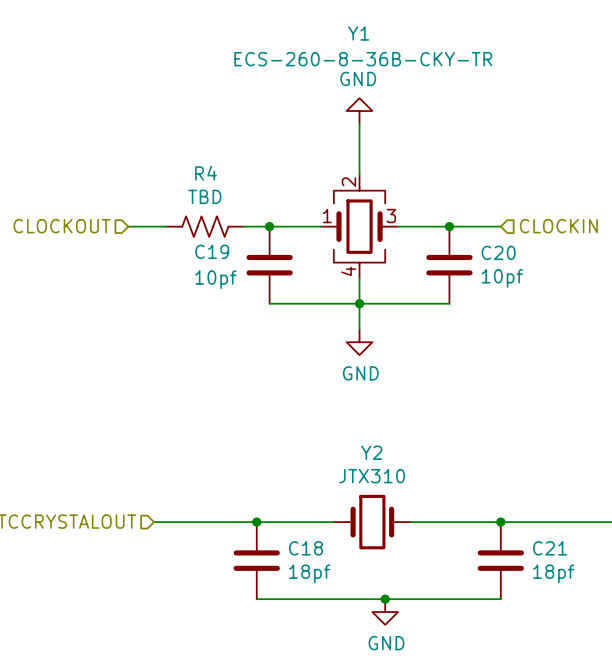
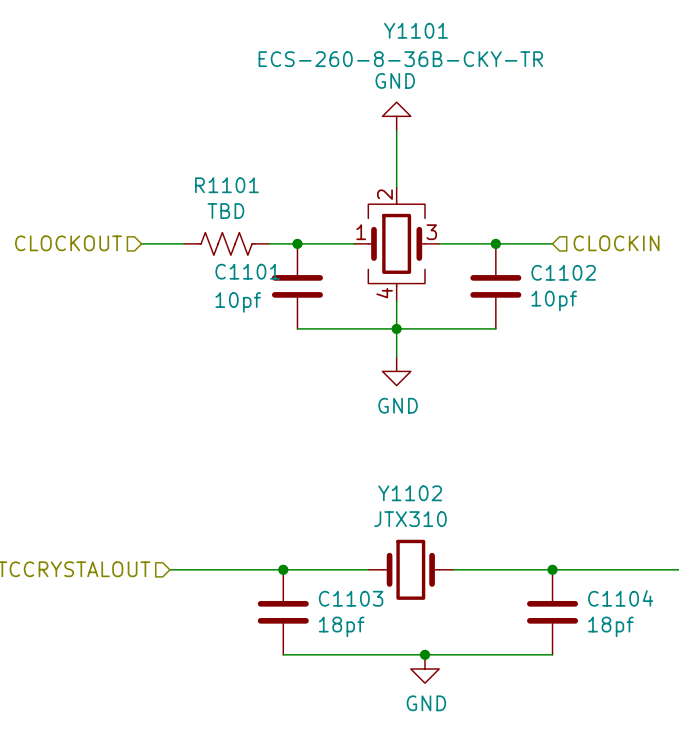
Y1 name: Y1 (358, 33) -> Y1101 (415, 30)
R4 name: R4 (205, 173) -> R1101 (226, 185)
C19 name: C19 (212, 251) -> C1101 (247, 271)
C20 name: C20 (498, 252) -> C1102 (563, 272)
Y2 name: Y2 (371, 452) -> Y1102 (410, 493)
C18 name: C18 (305, 548) -> C1103 (351, 598)
C21 name: C21 (550, 548) -> C1104 (620, 598)

